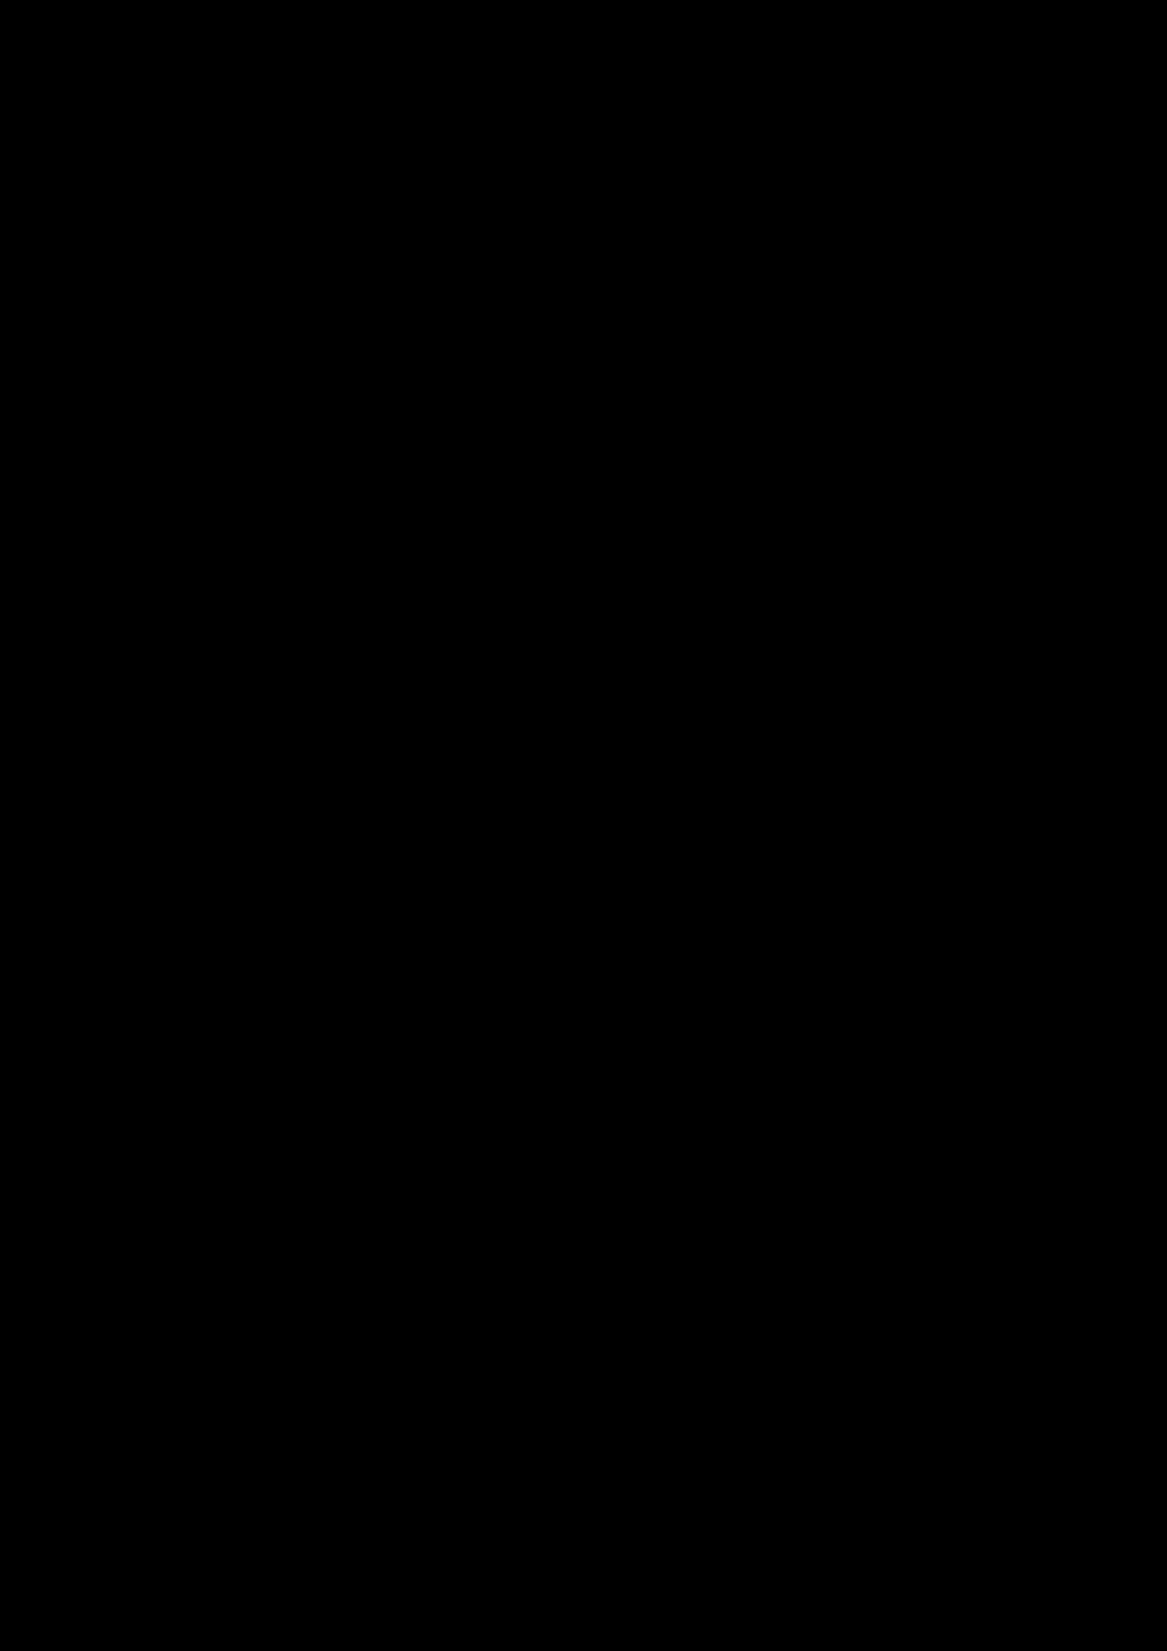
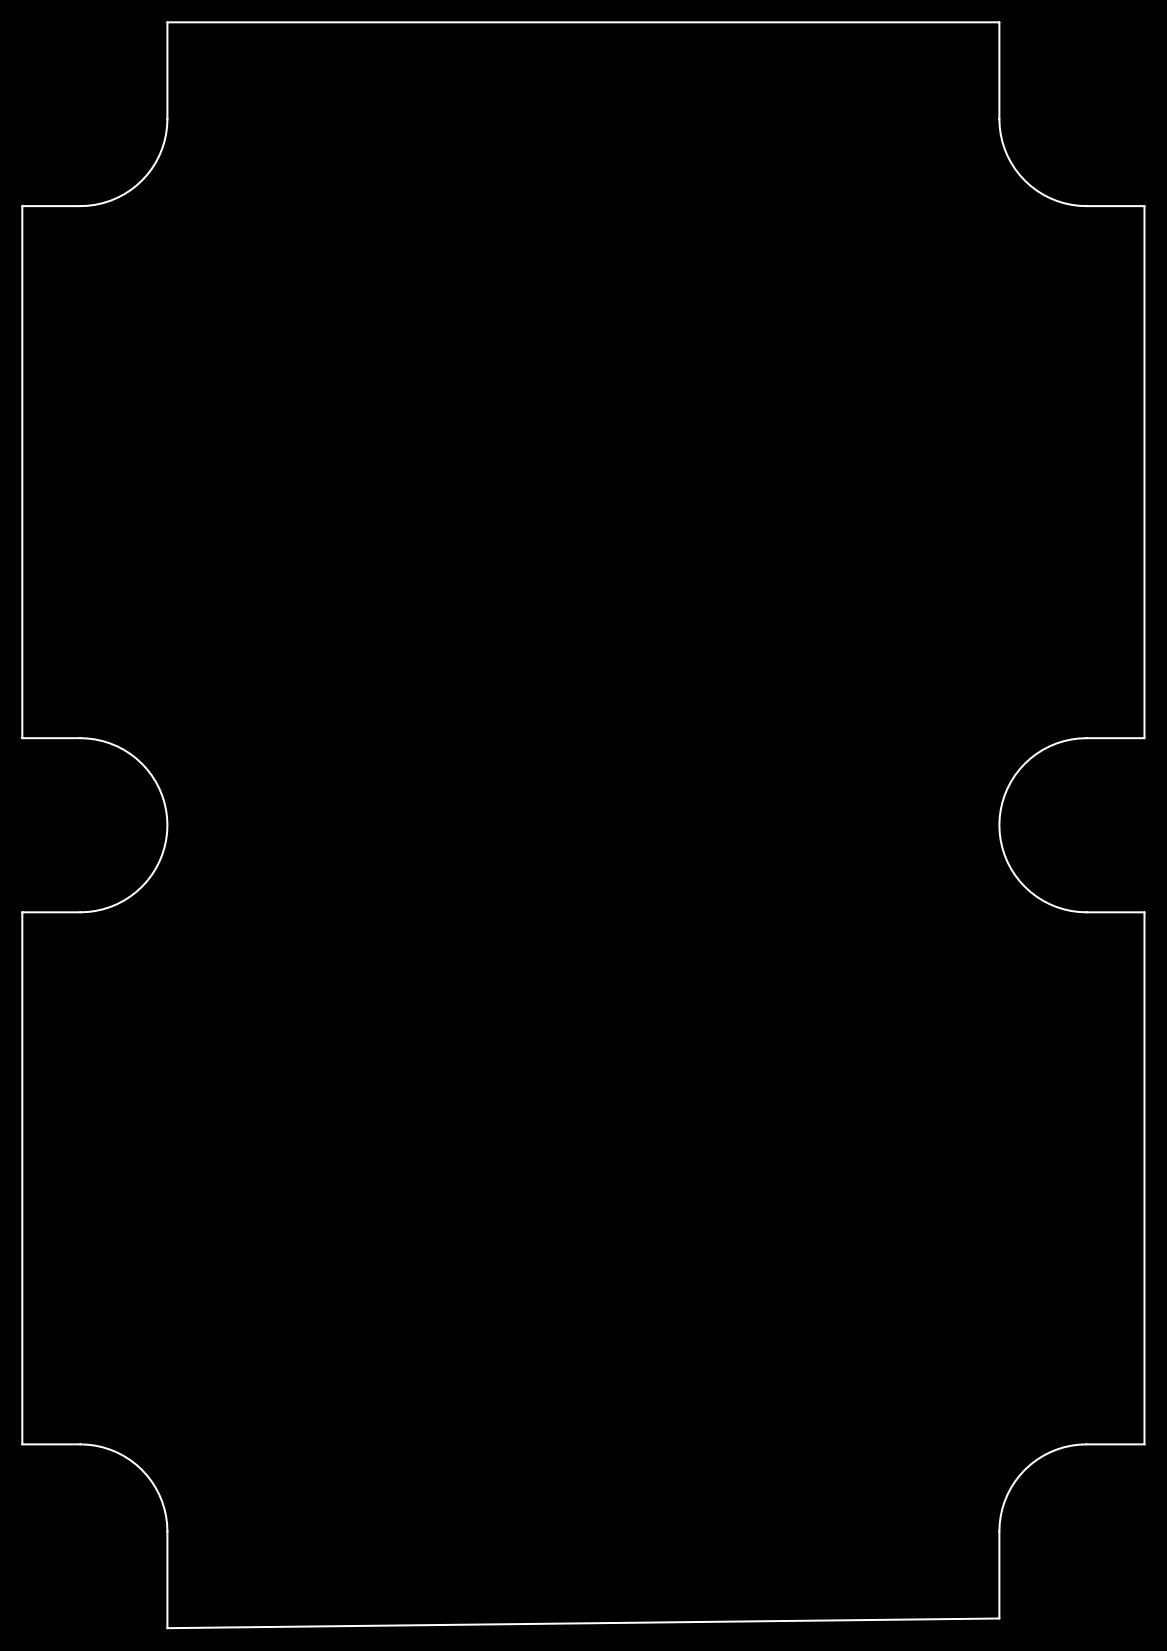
board edge: none -> (999, 22) (1000, 134) (1007, 155) (1019, 175) (1036, 190) (1063, 203) (1086, 206) (1144, 206) (1144, 738) (1078, 738) (1063, 741) (1042, 749) (1024, 763) (1011, 781) (1002, 802) (999, 825) (1002, 847) (1011, 868) (1024, 886) (1042, 900) (1063, 909) (1078, 911) (1144, 912) (1144, 1444) (1086, 1444) (1063, 1447) (1036, 1460) (1019, 1475) (1007, 1494) (1000, 1516) (999, 1618) (167, 1628) (166, 1516) (159, 1494) (147, 1475) (130, 1460) (102, 1447) (80, 1444) (22, 1444) (22, 912) (87, 911) (102, 909) (123, 900) (141, 886) (155, 868) (164, 847) (167, 825) (164, 802) (155, 781) (141, 763) (123, 749) (102, 741) (87, 738) (22, 738) (22, 206) (80, 206) (102, 203) (130, 190) (147, 175) (159, 155) (166, 134) (167, 22) (999, 22)

